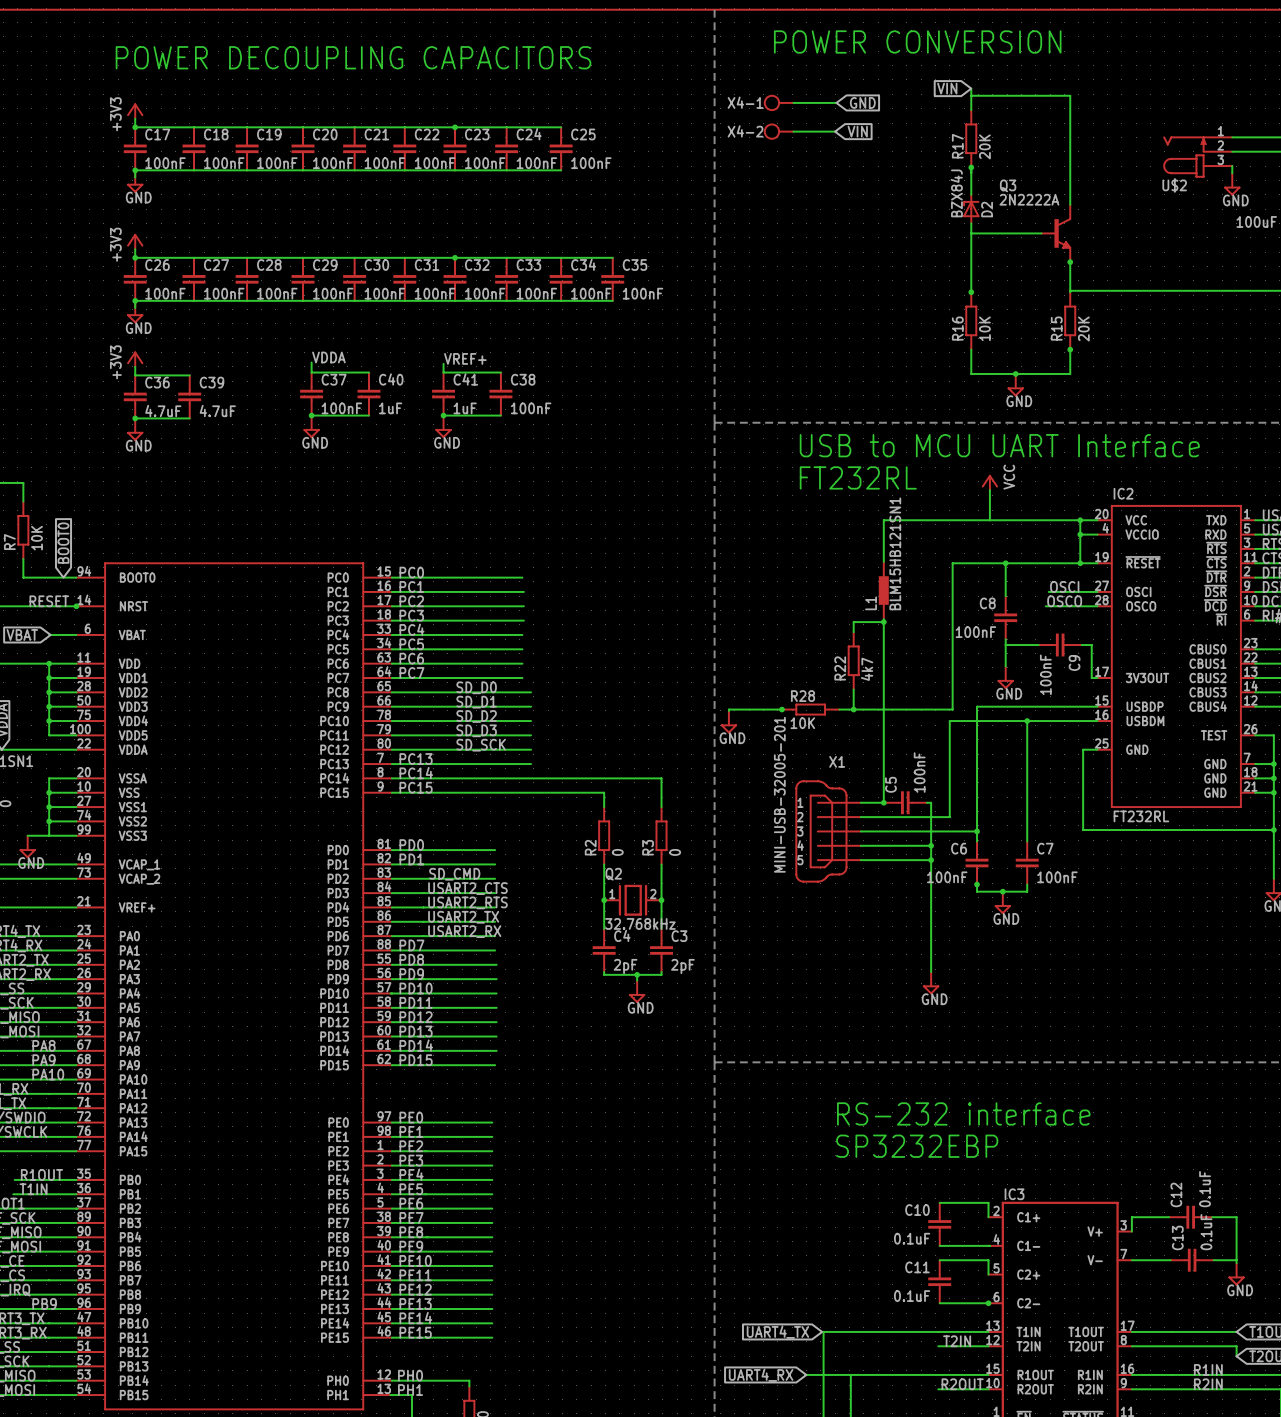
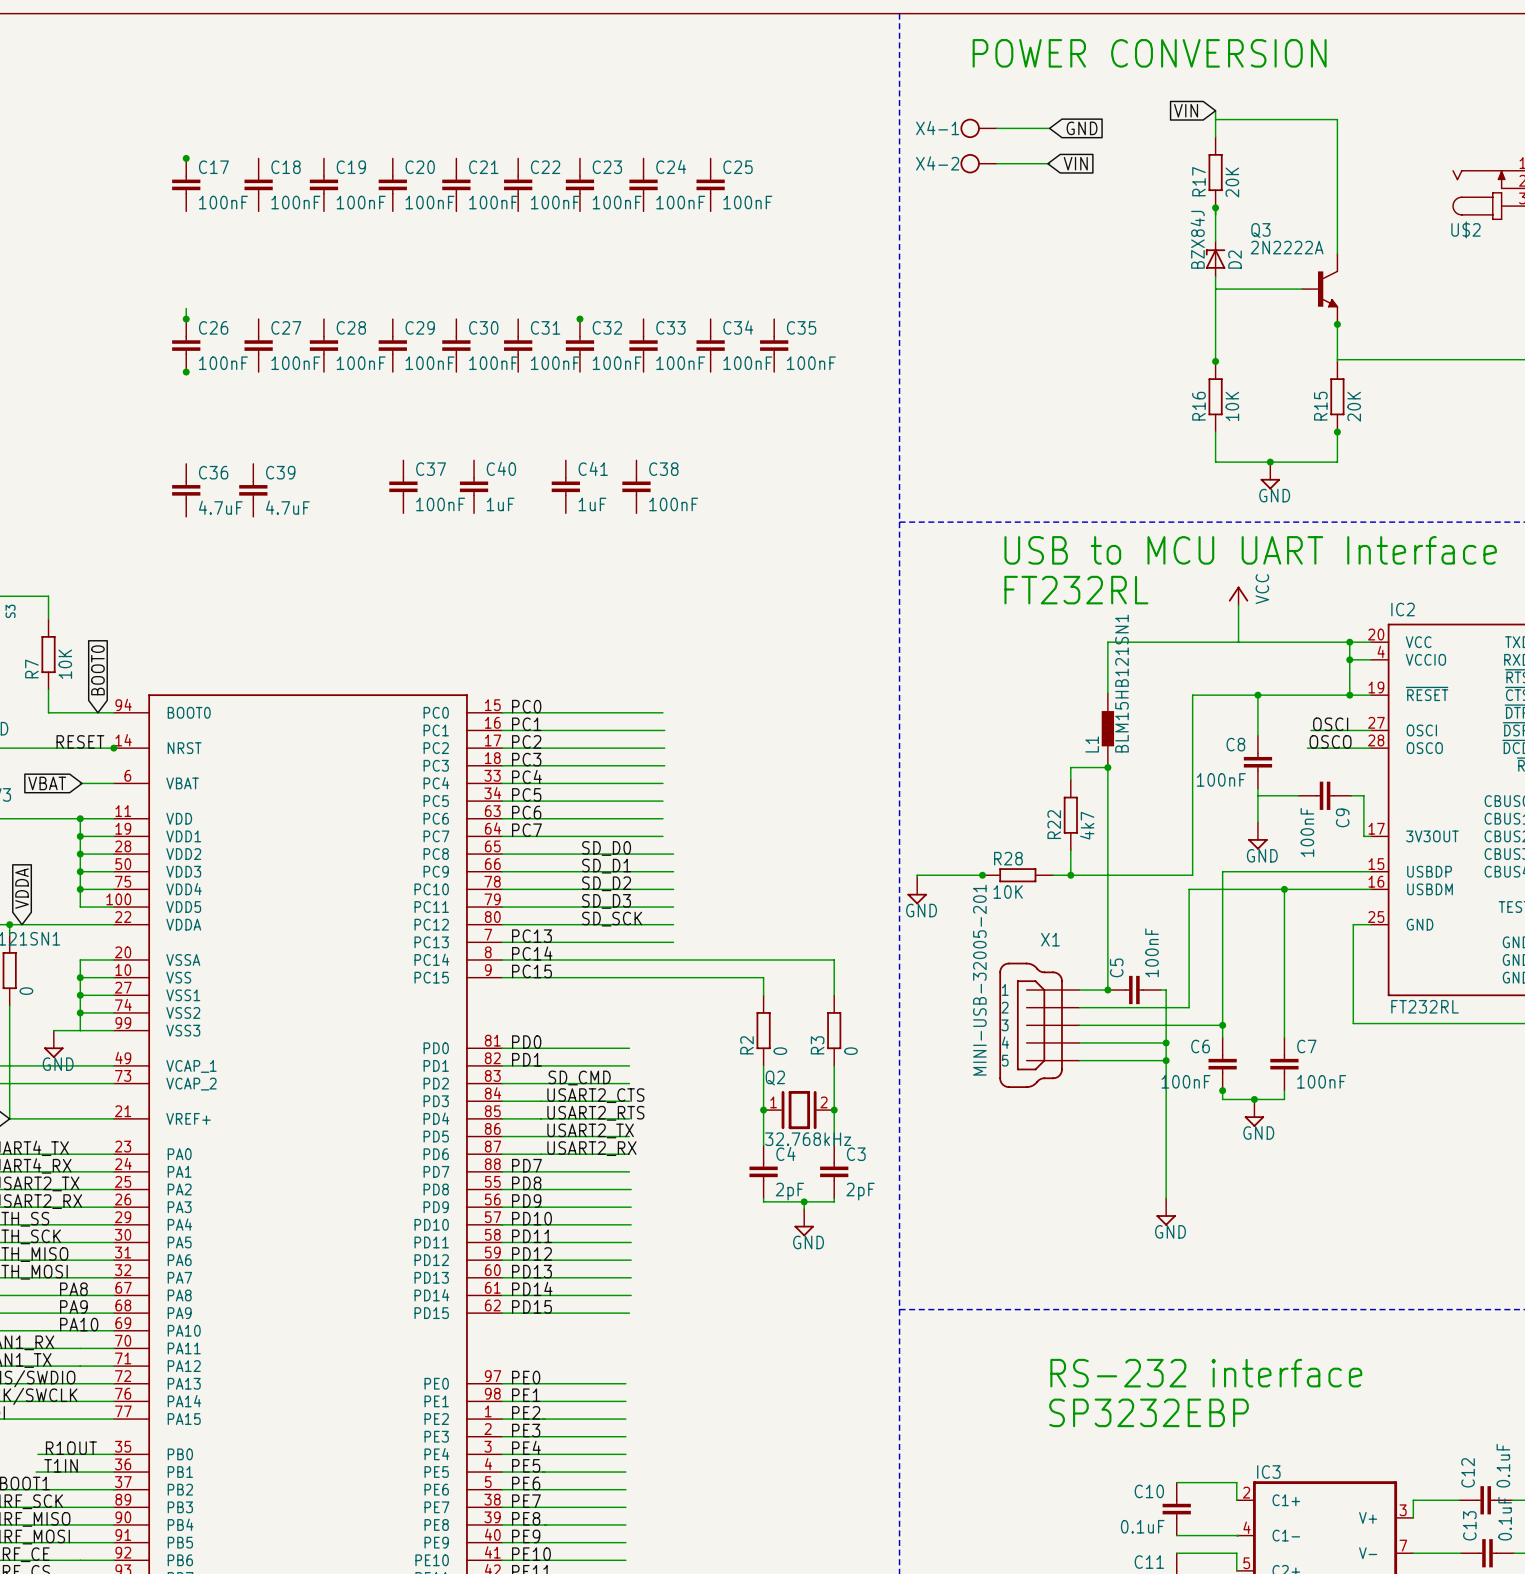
text: POWER DECOUPLING CAPACITORS (353, 57) -> none
power symbol: +3V3 (135, 111) -> none
wire: (135, 118) (135, 128) -> none
wire: (135, 127) (561, 127) -> none
junction: (455, 127) -> none
junction: (135, 170) -> none
wire: (561, 170) (135, 170) (135, 177) -> none
power symbol: GND (135, 181) -> none
power symbol: +3V3 (135, 241) -> none
wire: (135, 257) (612, 257) -> none
wire: (612, 300) (135, 300) (135, 308) -> none
power symbol: GND (135, 311) -> none
label: VDDA (328, 357) -> none
label: VREF+ (465, 358) -> none
power symbol: +3V3 (135, 359) -> none
wire: (311, 362) (311, 372) (368, 372) -> none
wire: (443, 363) (443, 372) (500, 372) -> none
wire: (135, 366) (135, 375) (189, 375) -> none
wire: (311, 415) (368, 415) -> none
junction: (311, 415) -> none
wire: (443, 415) (500, 415) -> none
junction: (443, 415) -> none
wire: (135, 418) (189, 418) -> none
junction: (135, 418) -> none
power symbol: GND (311, 426) -> none
power symbol: GND (443, 426) -> none
power symbol: GND (135, 429) -> none

